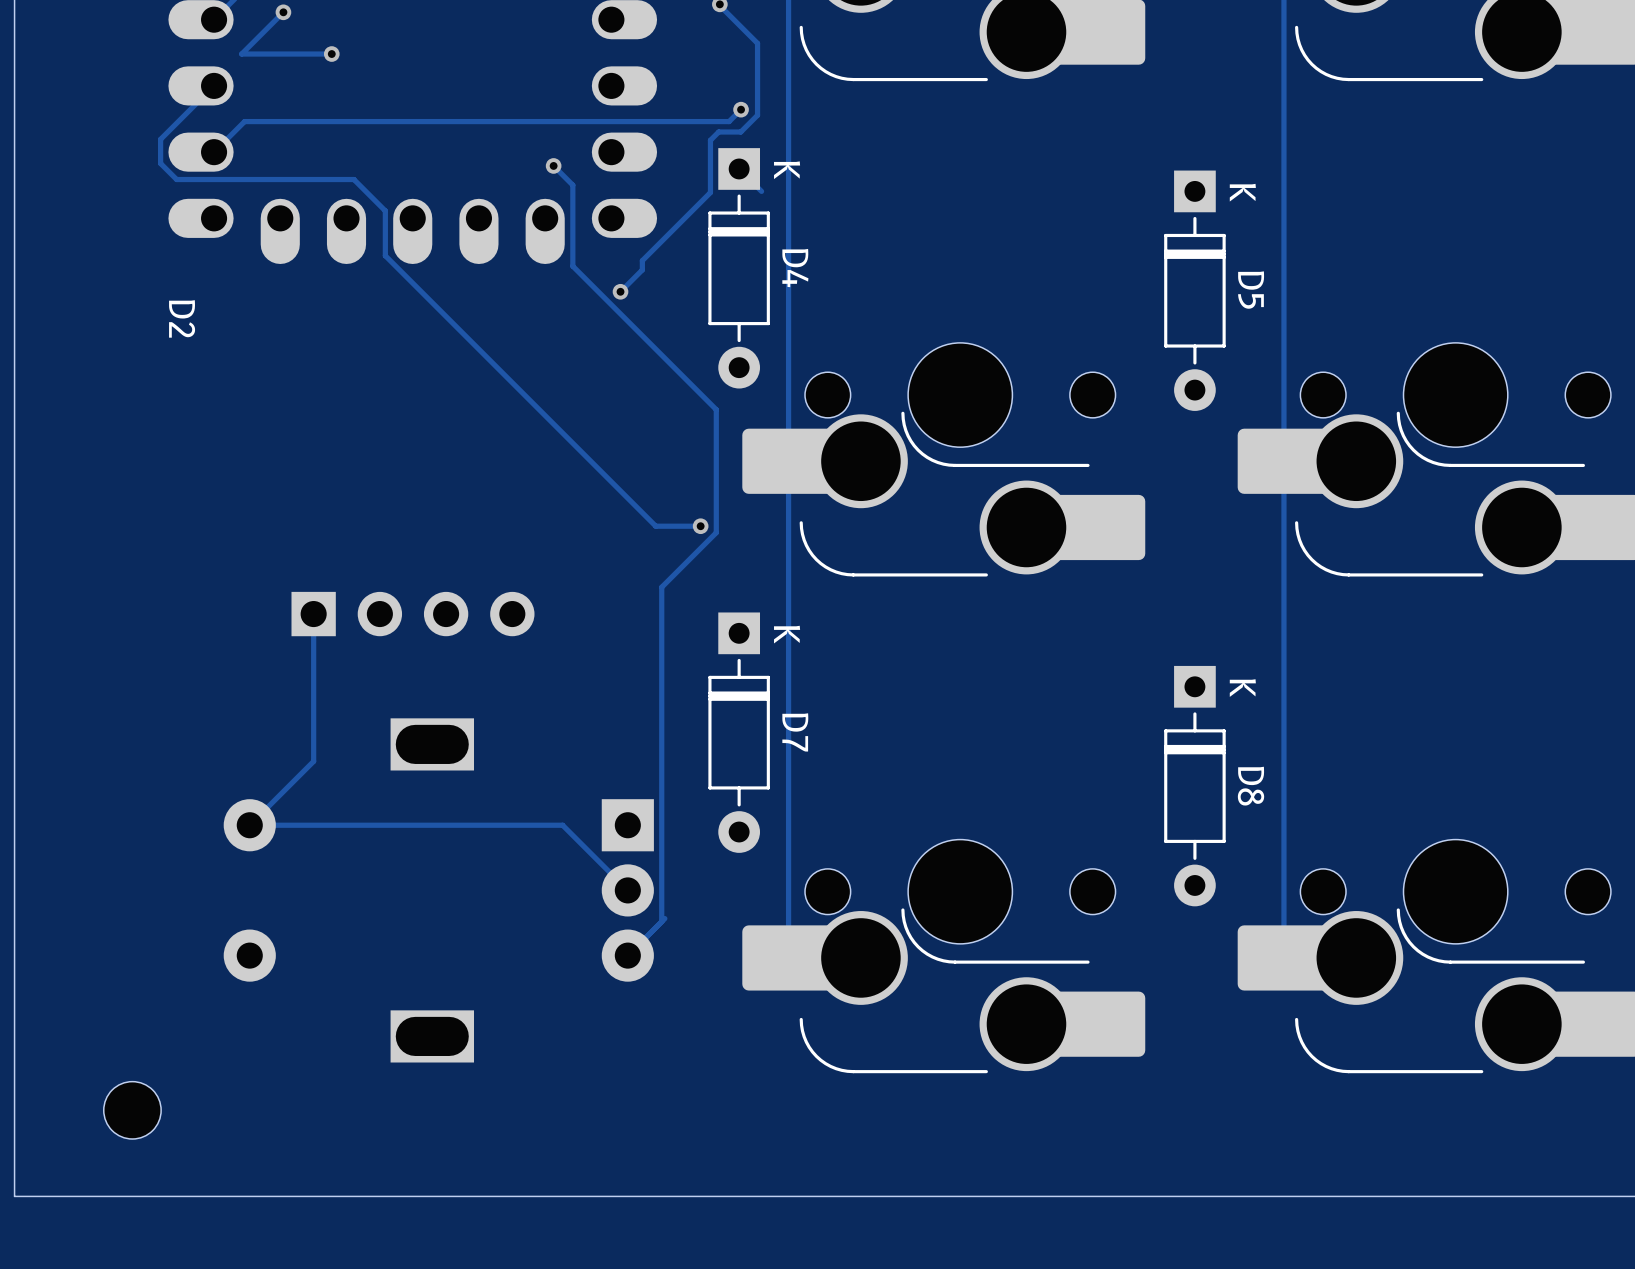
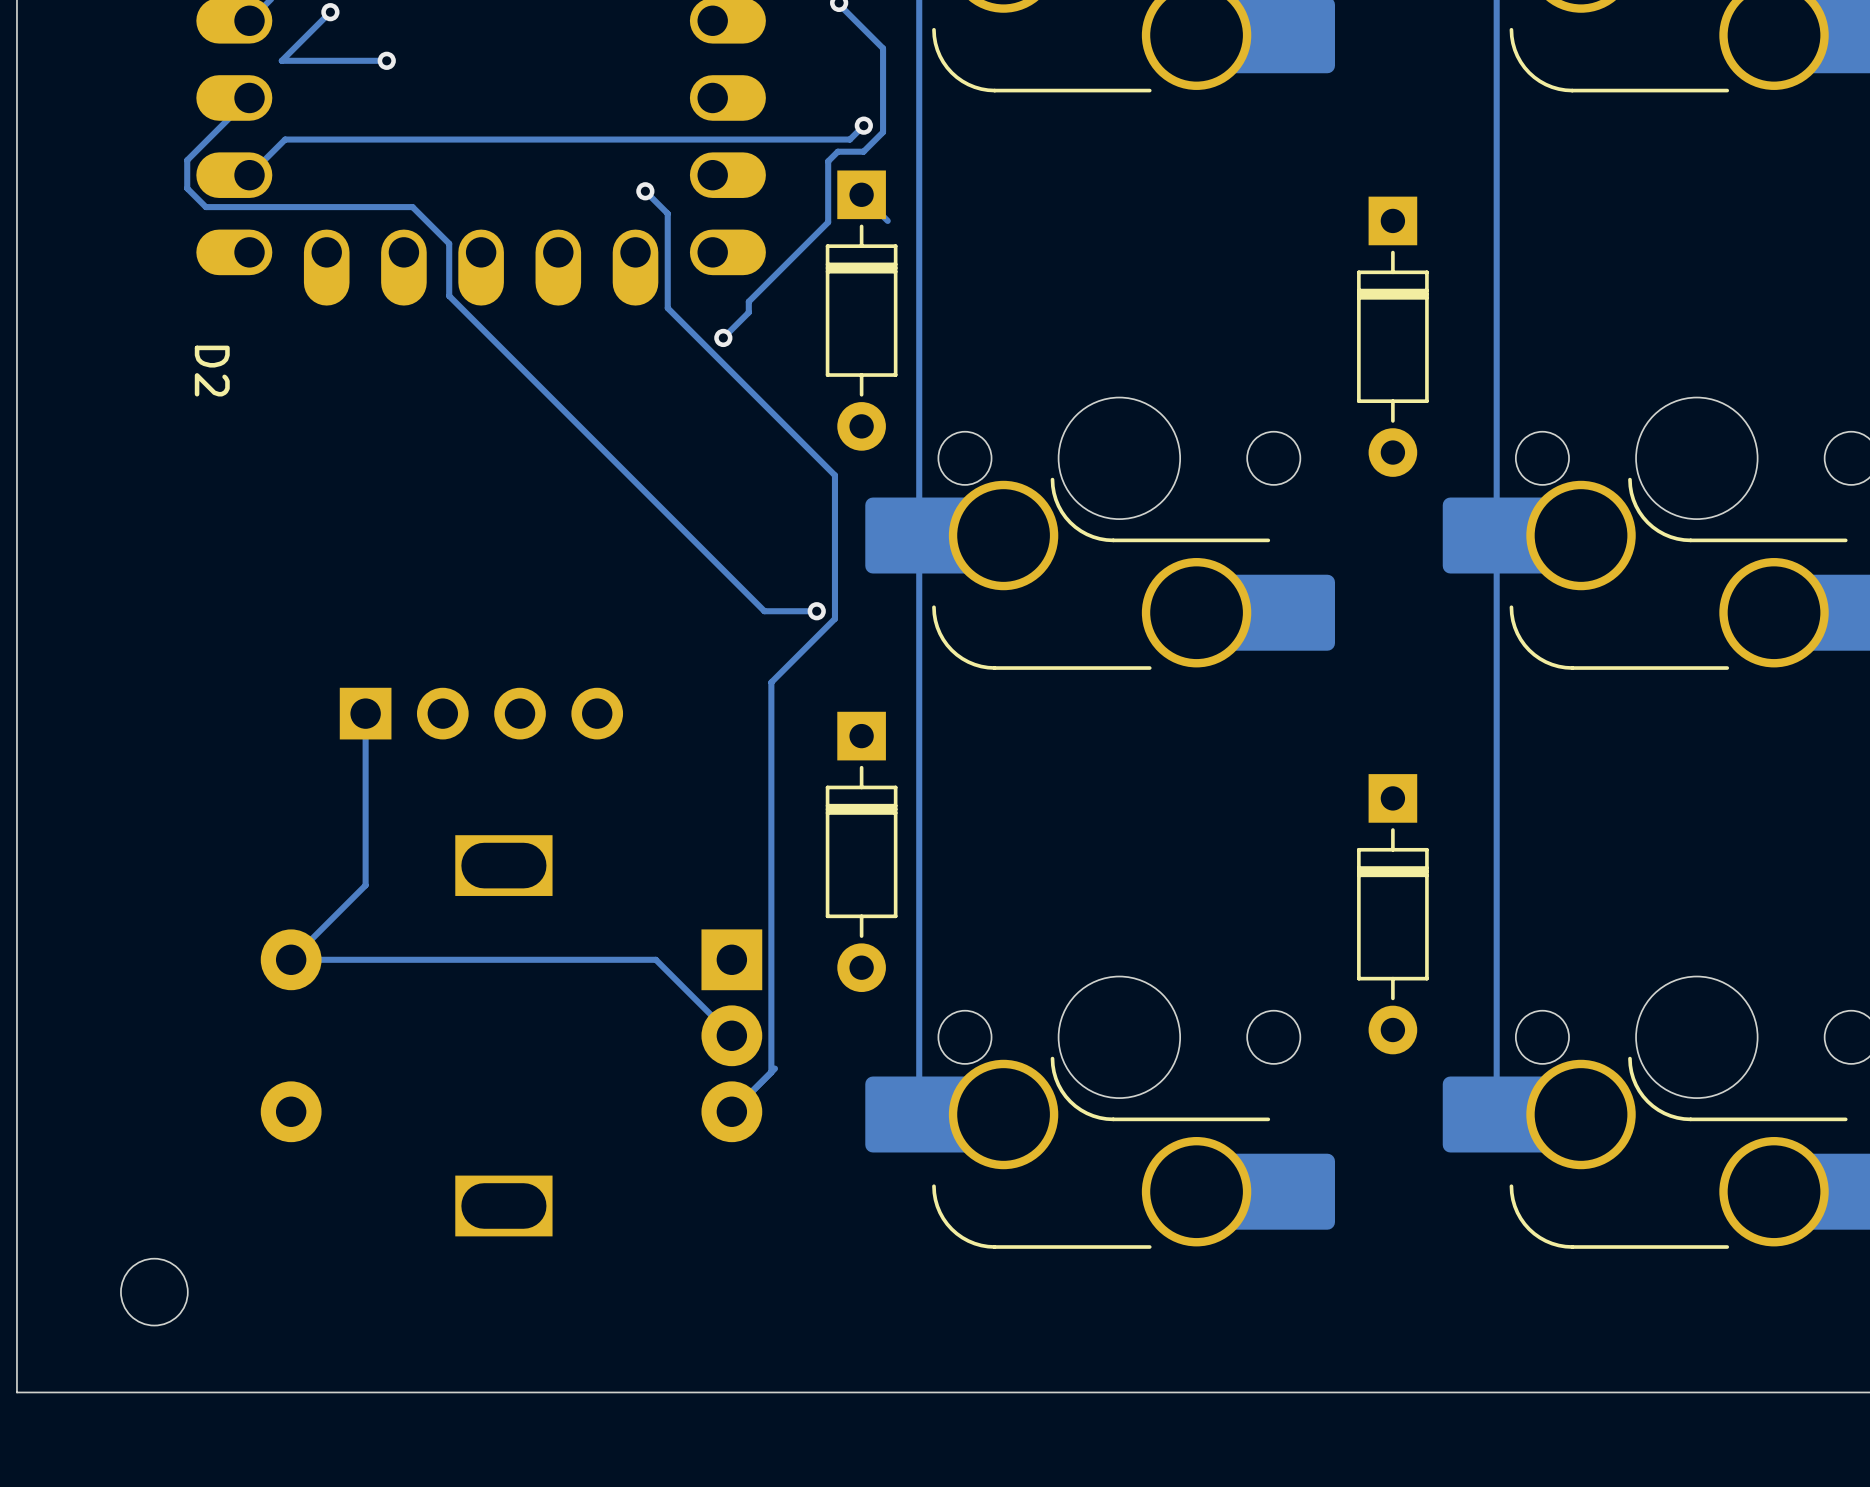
D4 text: K (787, 170) -> none
D5 text: K (1242, 192) -> none
D4 name: D4 (795, 268) -> none
D5 name: D5 (1251, 290) -> none
D7 text: K (787, 634) -> none
D8 text: K (1242, 688) -> none
D7 name: D7 (795, 732) -> none
D8 name: D8 (1251, 786) -> none

